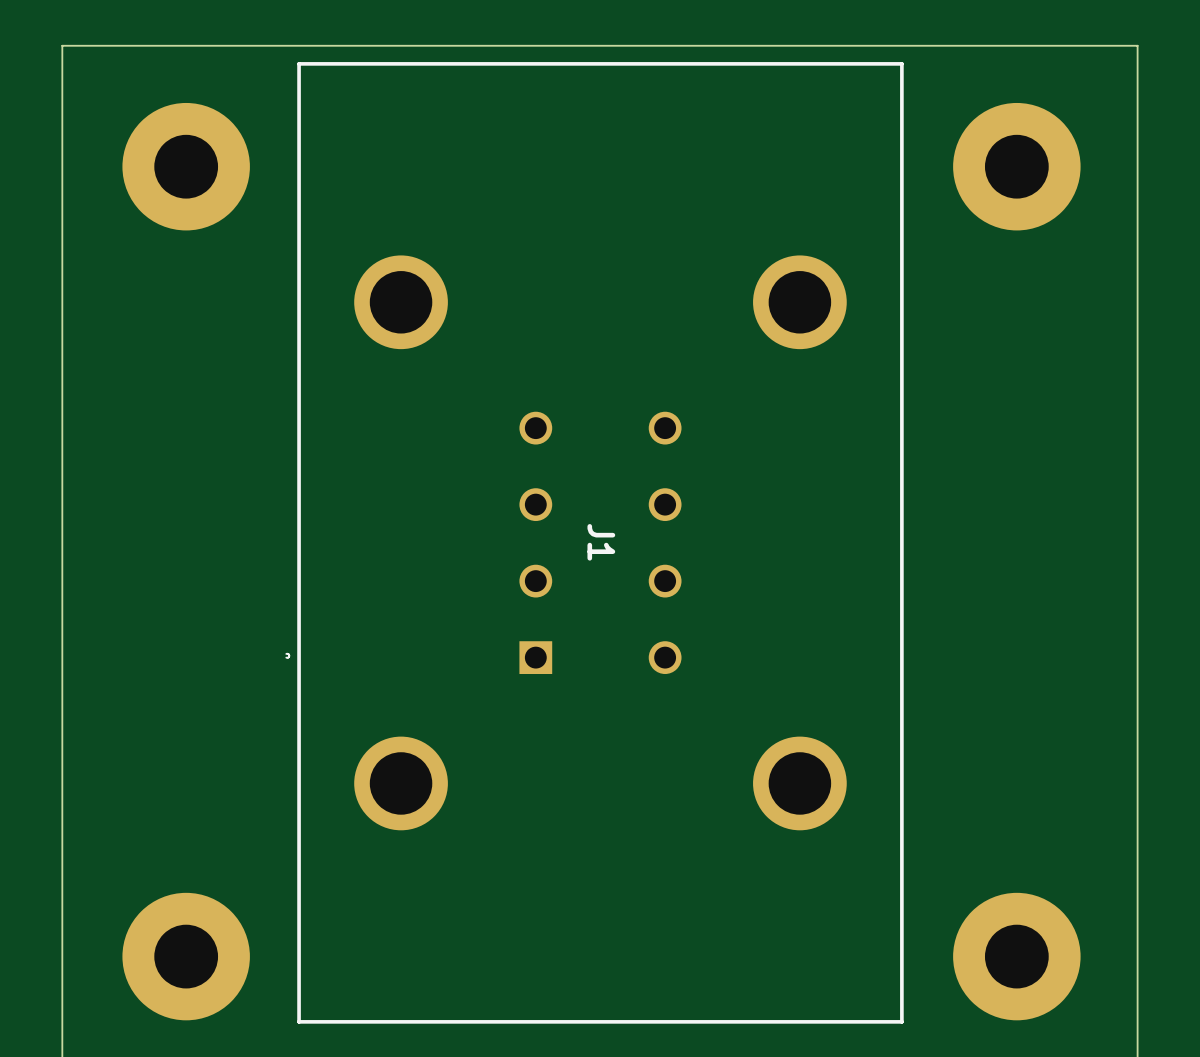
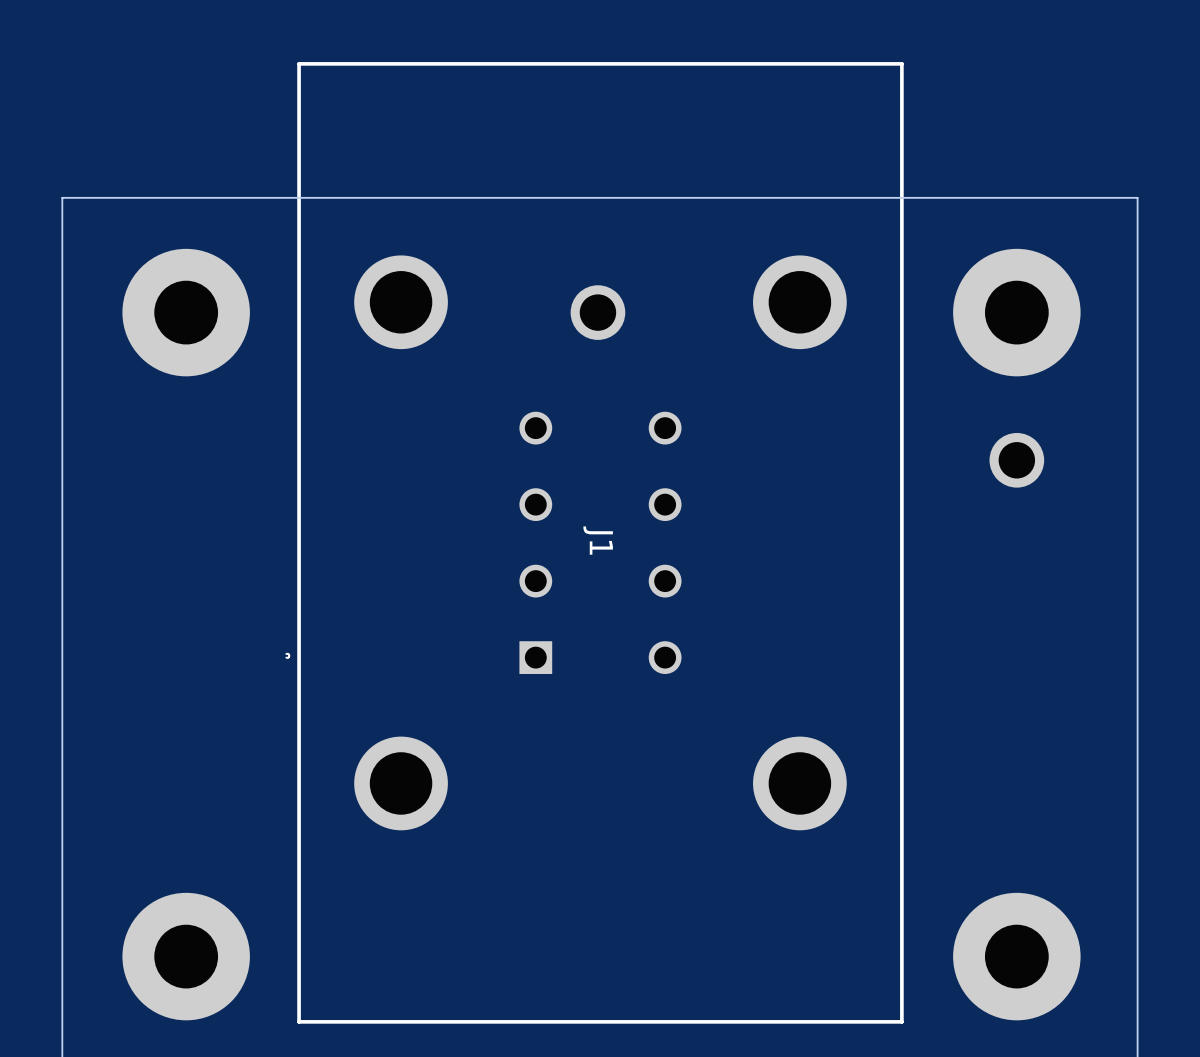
part position: (186, 166) -> (186, 312)
part position: (1016, 166) -> (1016, 312)
board edge: (1137, 197) (1137, 45) (62, 45) (62, 197) -> (1137, 197) (62, 197)
part: none -> (597, 312)
part: none -> (1016, 460)

